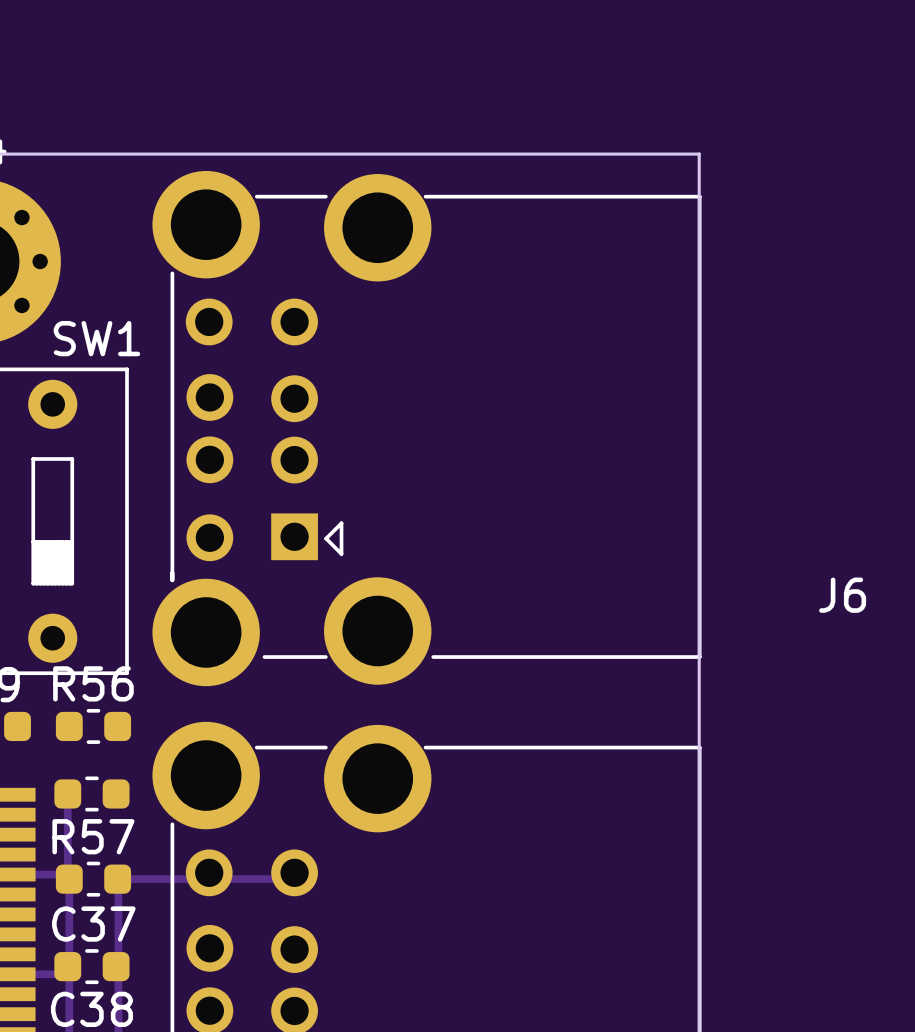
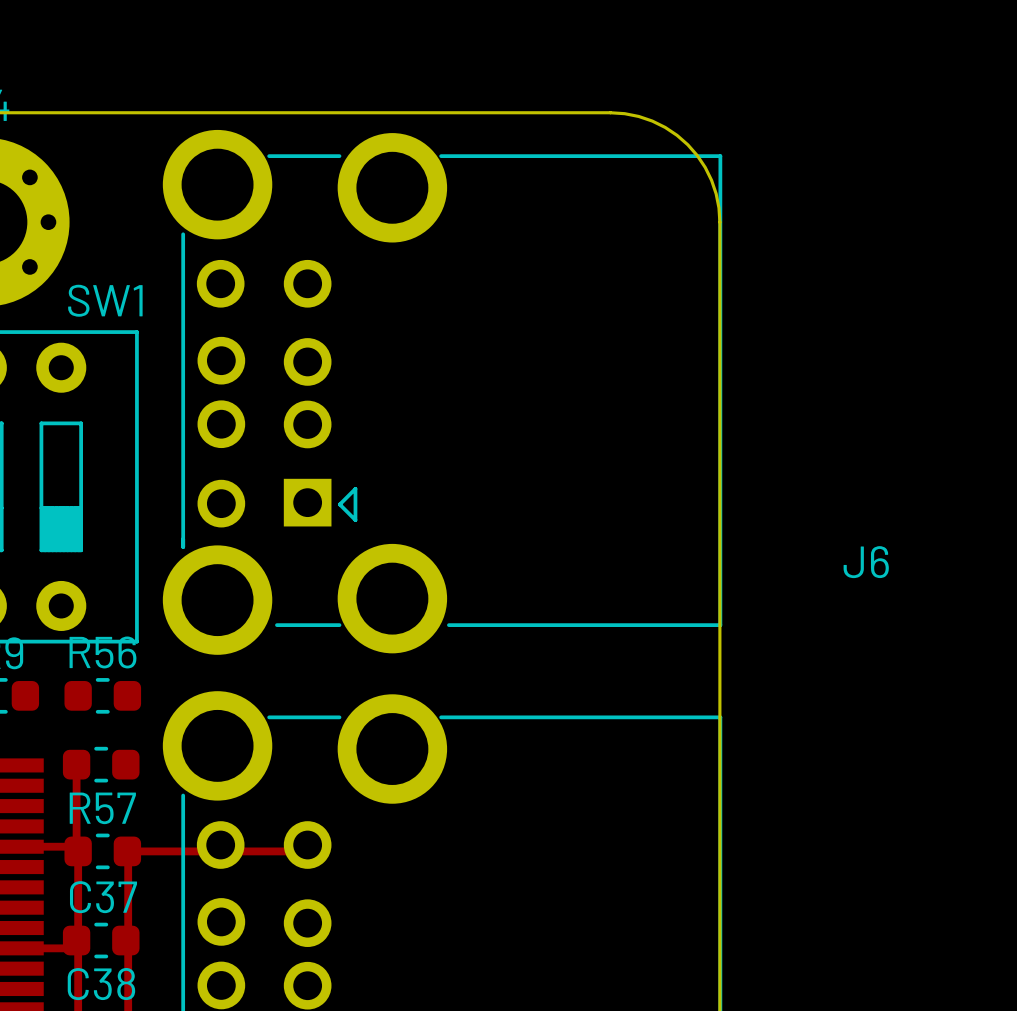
board edge: (591, 154) (699, 154) (699, 261) -> (610, 112) (624, 113) (652, 121) (665, 127) (687, 144) (705, 167) (711, 180) (716, 193) (719, 222)

